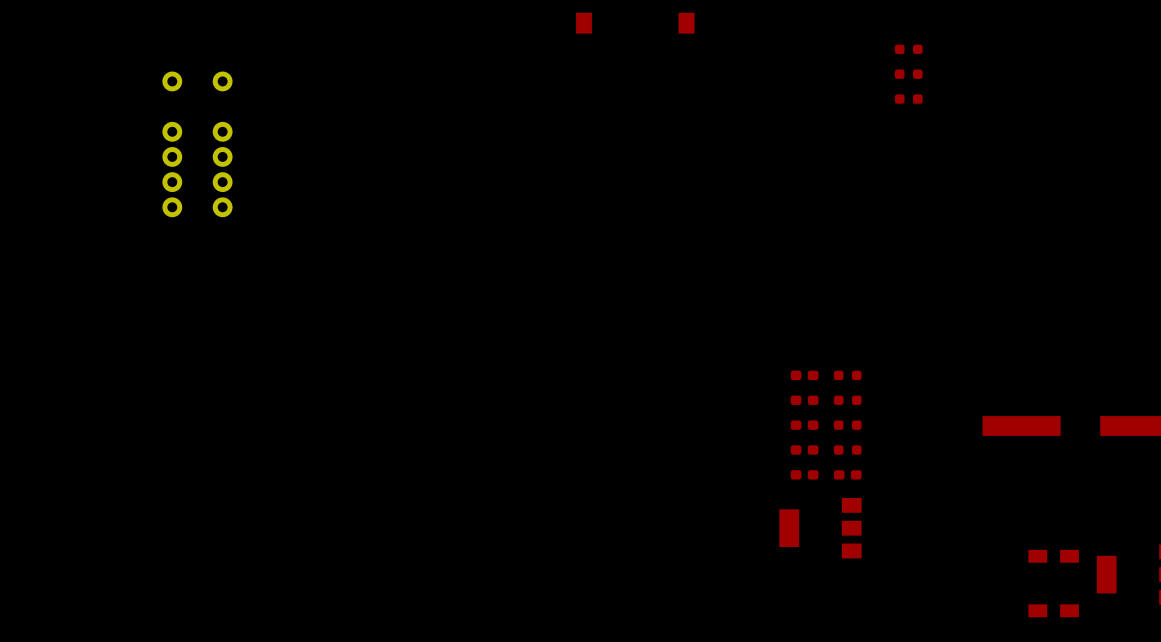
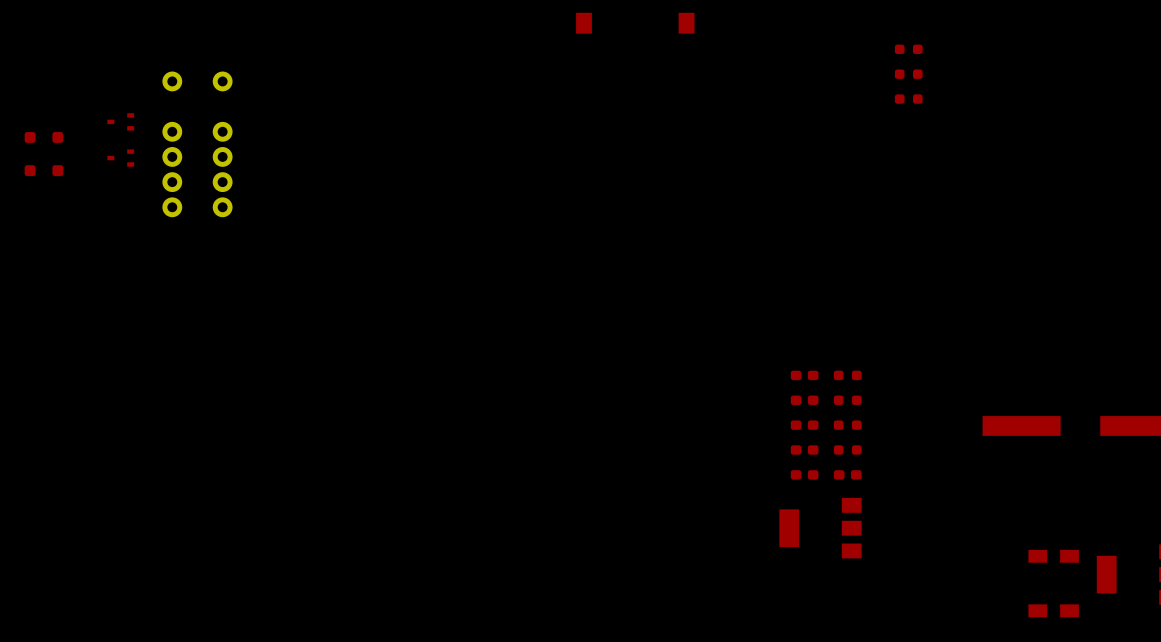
part: none -> (120, 121)
part: none -> (43, 137)
part: none -> (120, 158)
part: none -> (43, 170)

